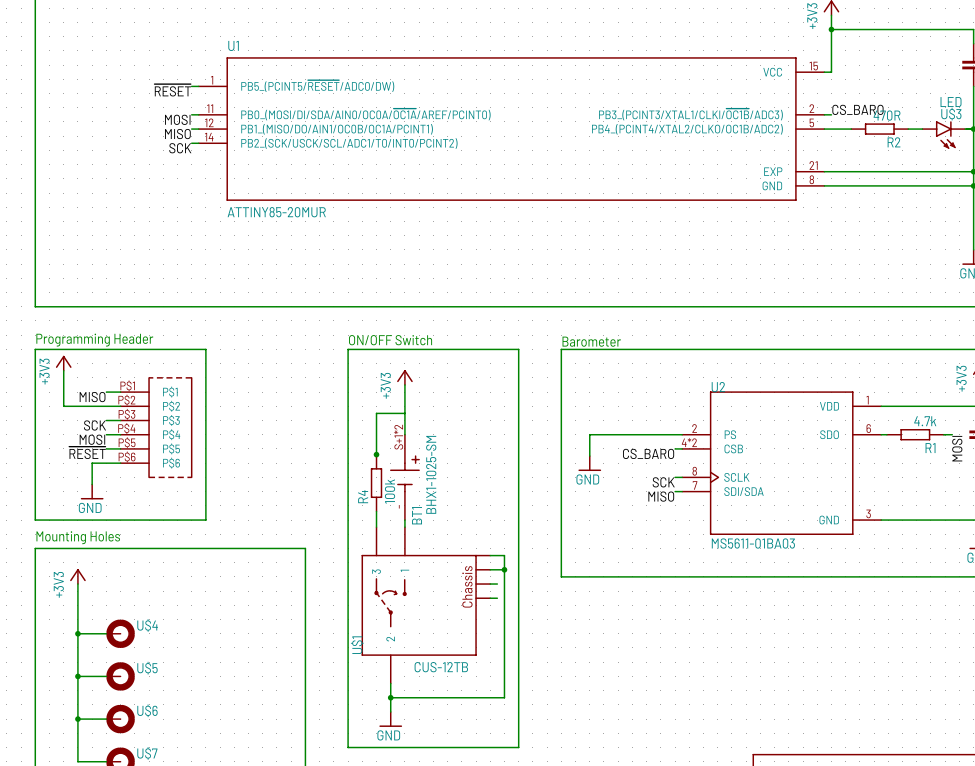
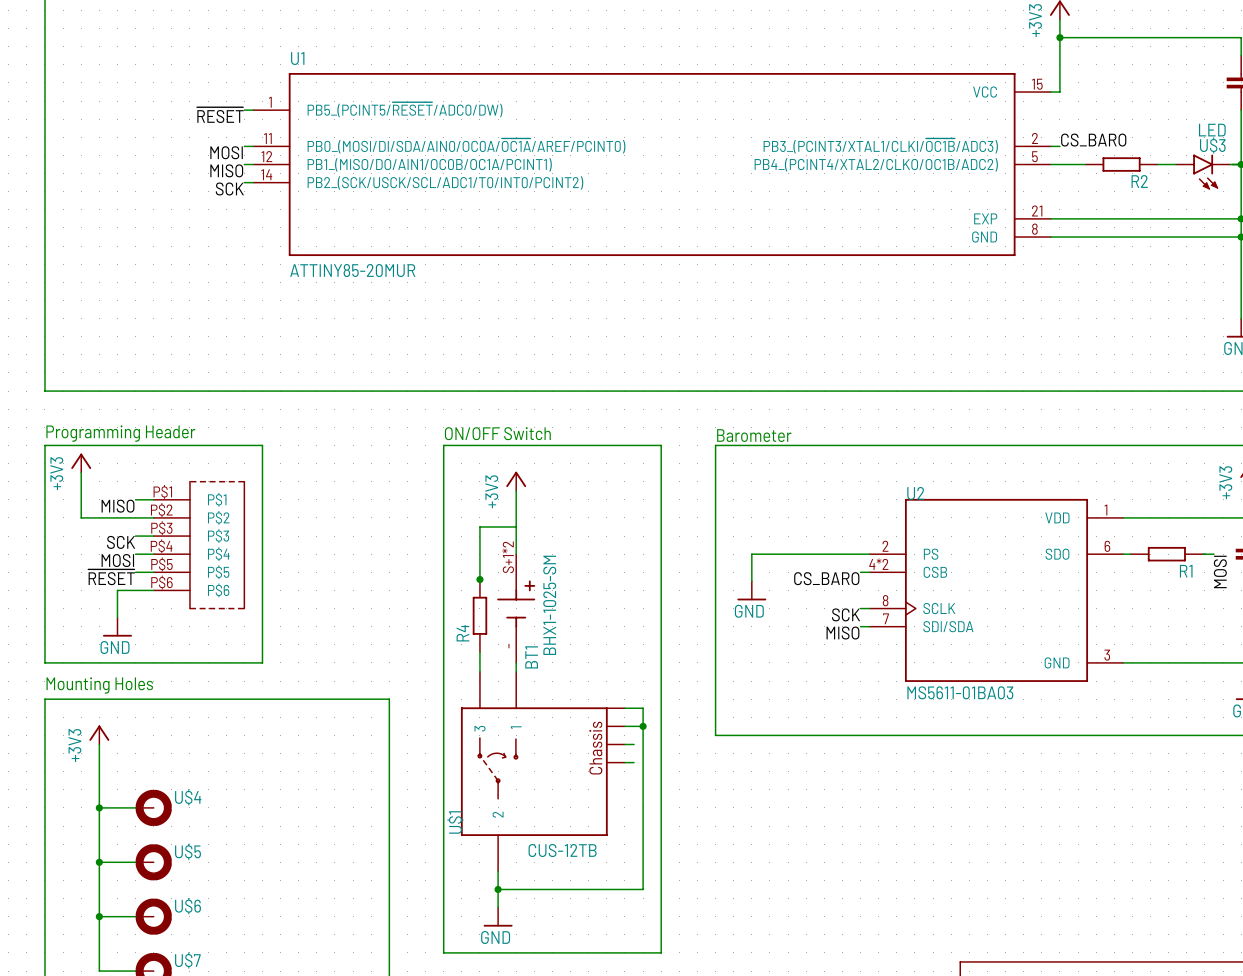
R2 value: 470R (887, 115) -> none
R1 value: 4.7k (925, 421) -> none
R4 value: 100k (390, 491) -> none

